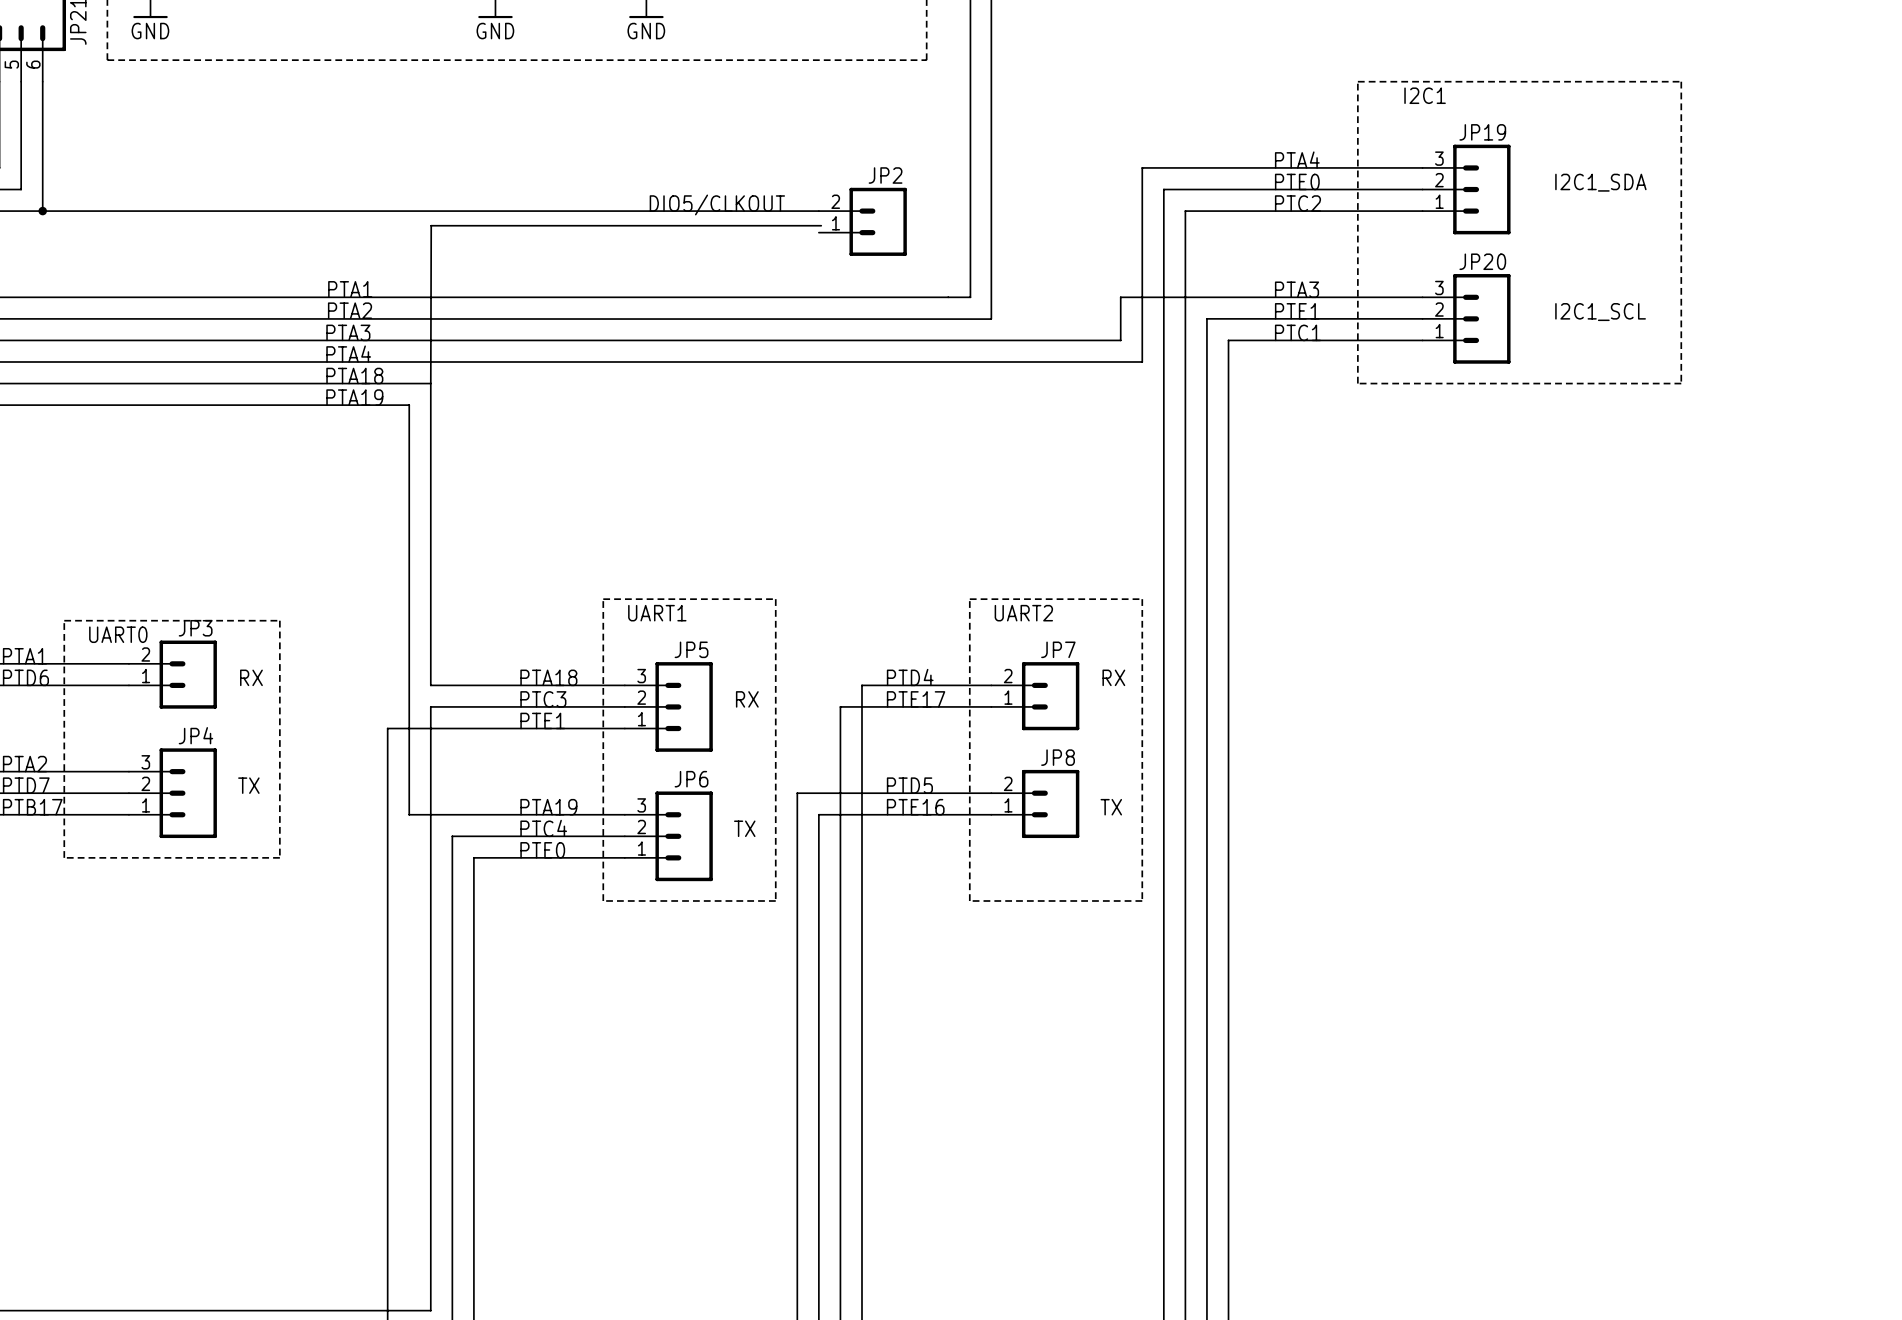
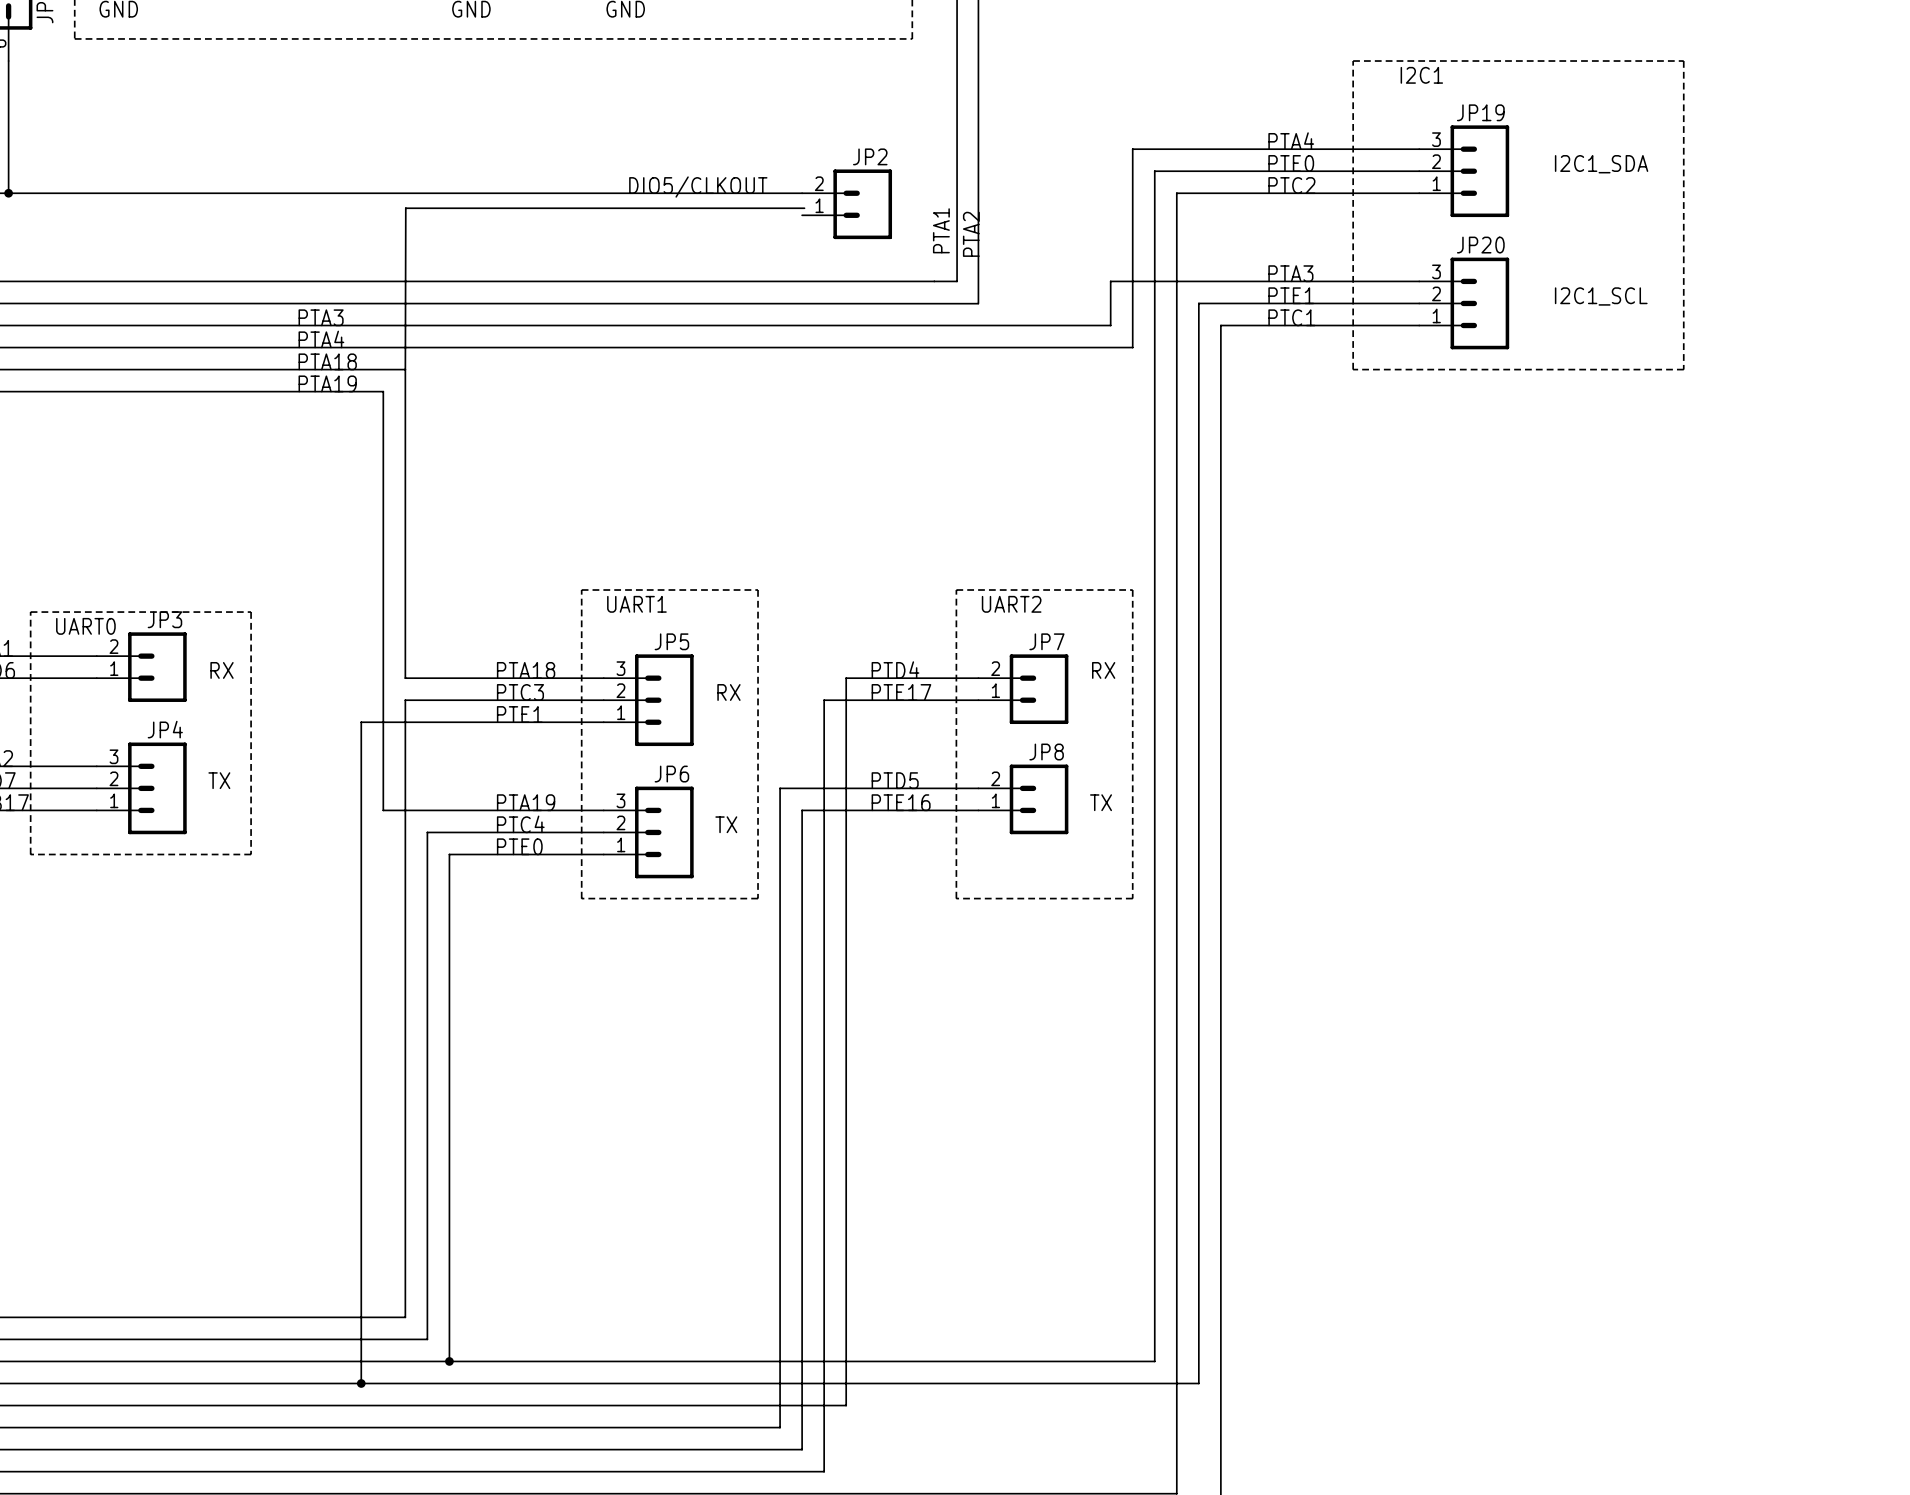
label: none -> PTA1 (941, 230)
label: none -> PTA2 (971, 234)
label: PTA1 (350, 289) -> none
label: PTA2 (350, 310) -> none

